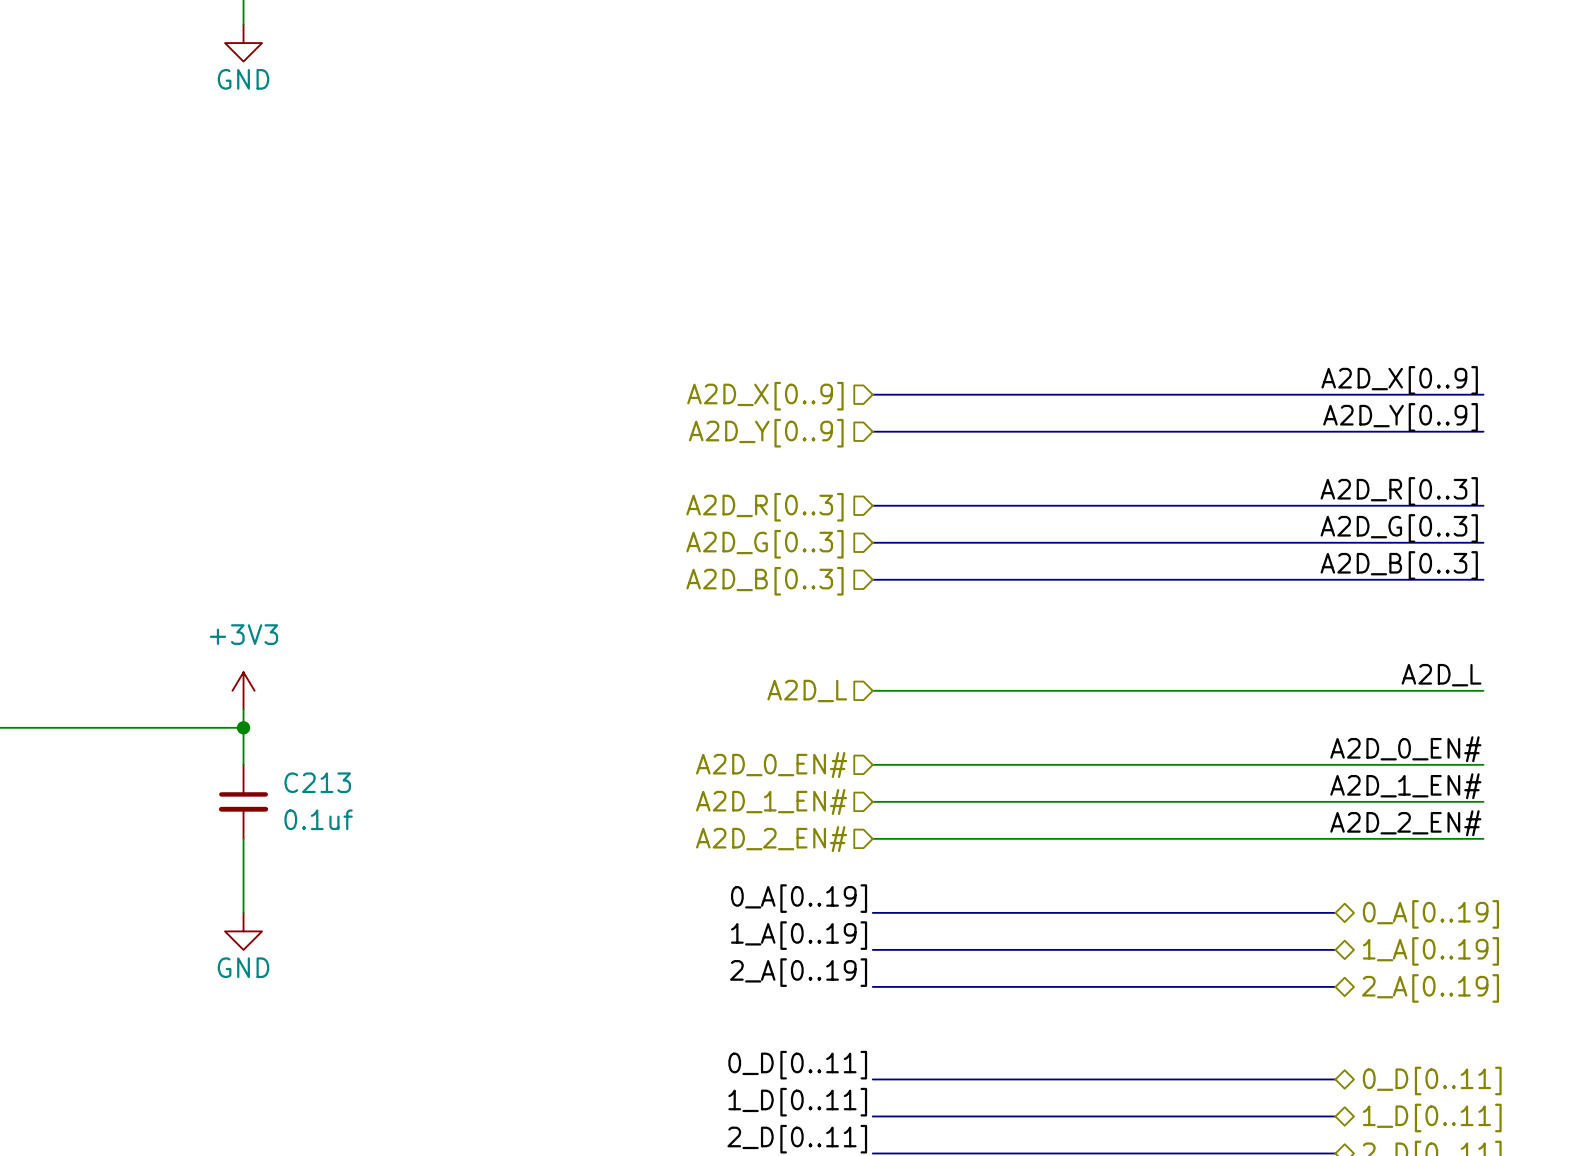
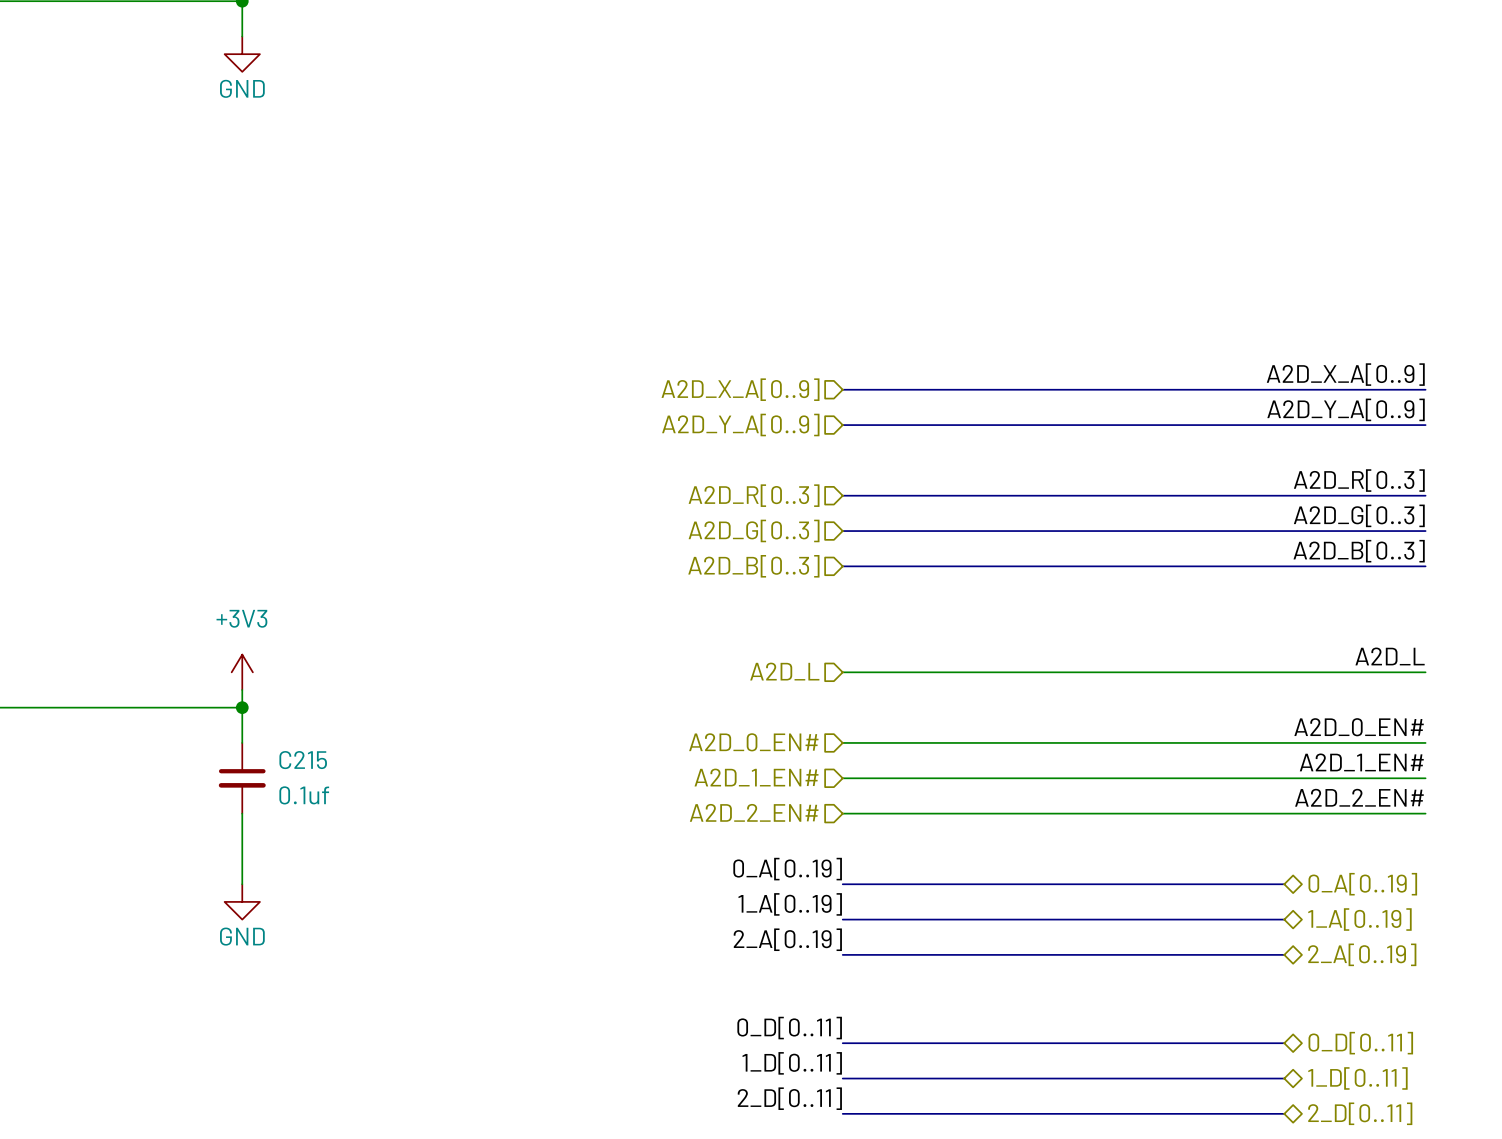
label: A2D_X[0..9] (1399, 380) -> A2D_X_A[0..9] (1345, 374)
hierarchical label: A2D_X[0..9] (765, 396) -> A2D_X_A[0..9] (740, 389)
label: A2D_Y[0..9] (1400, 417) -> A2D_Y_A[0..9] (1346, 409)
hierarchical label: A2D_Y[0..9] (766, 433) -> A2D_Y_A[0..9] (740, 425)
C213 name: C213 (317, 782) -> C215 (303, 760)

